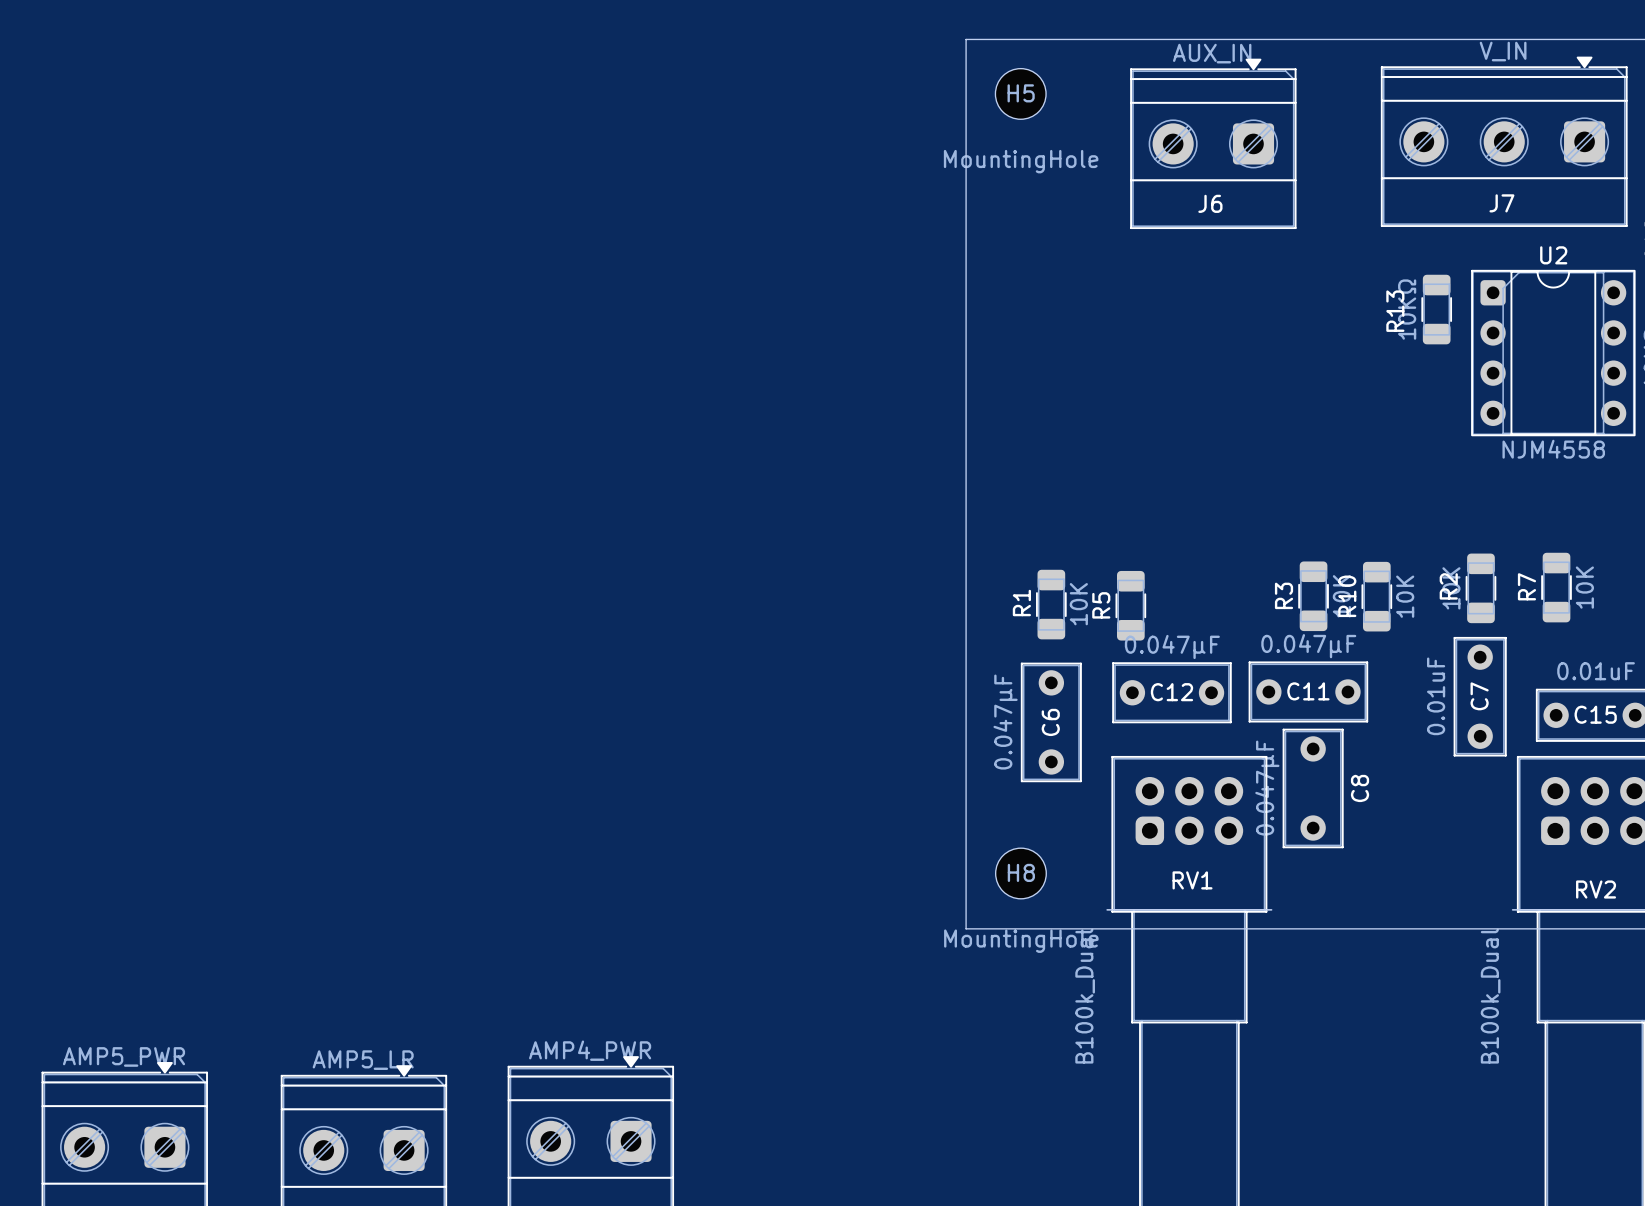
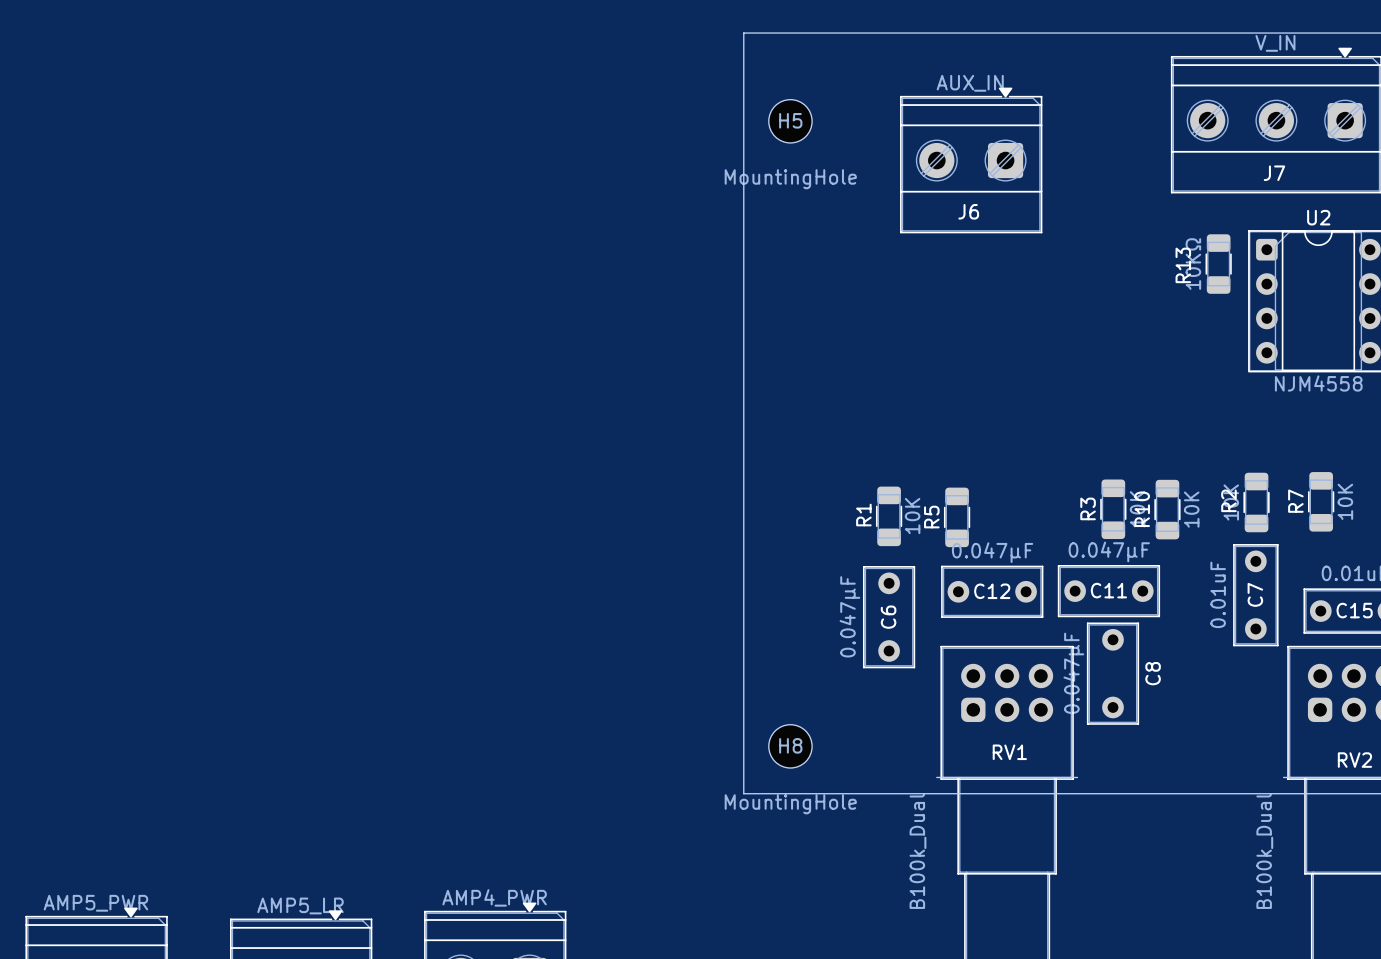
board edge: (966, 39) (966, 928) -> (816, 33) (743, 33) (743, 793) (816, 793)
H5 position: (1020, 93) -> (790, 121)
J6 position: (1213, 143) -> (971, 160)
H8 position: (1020, 873) -> (790, 746)

